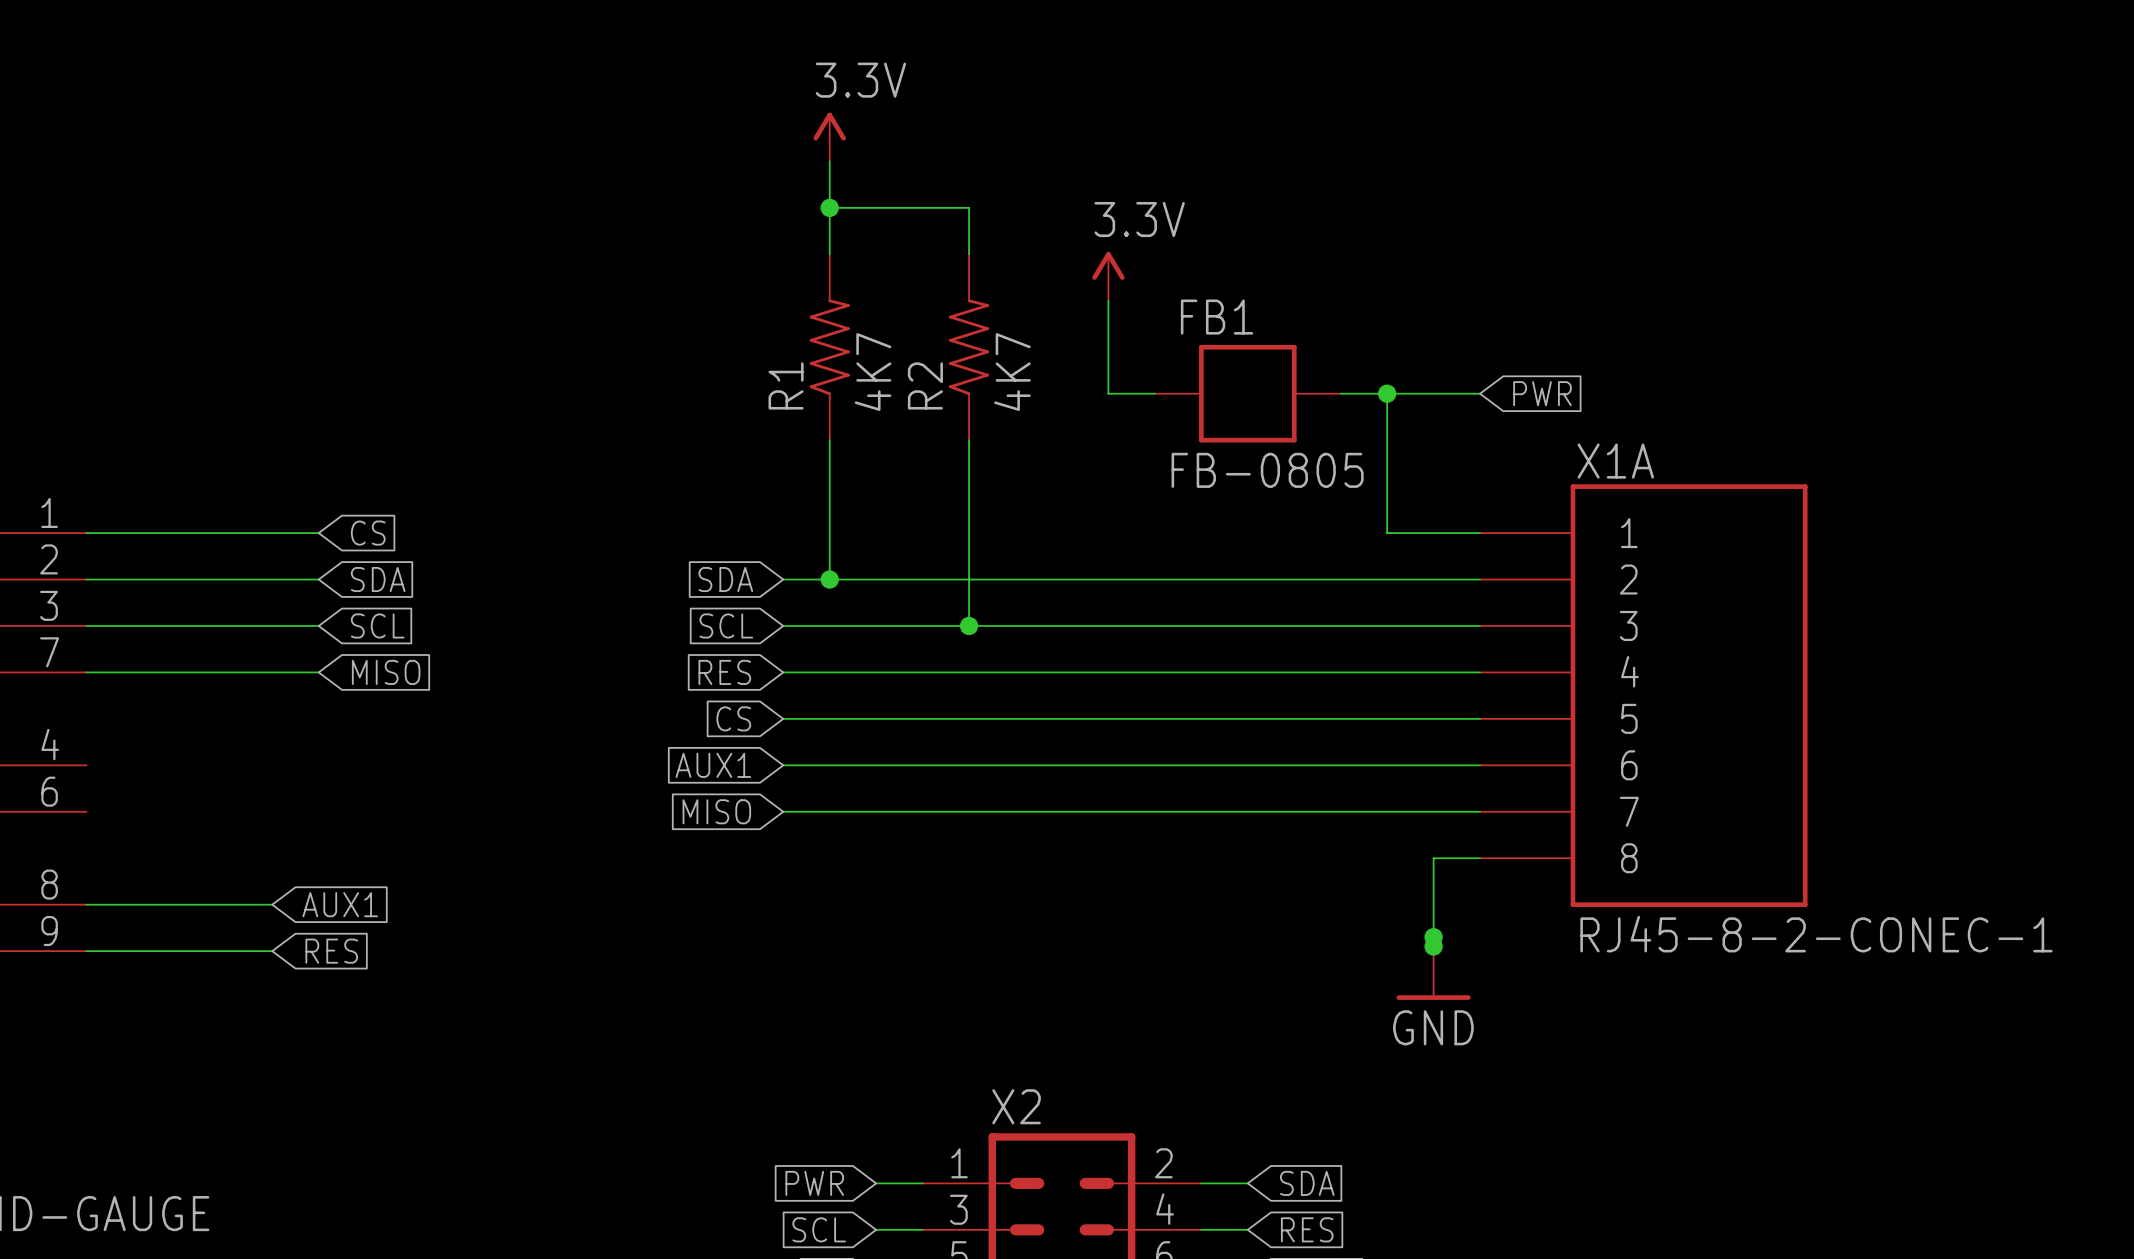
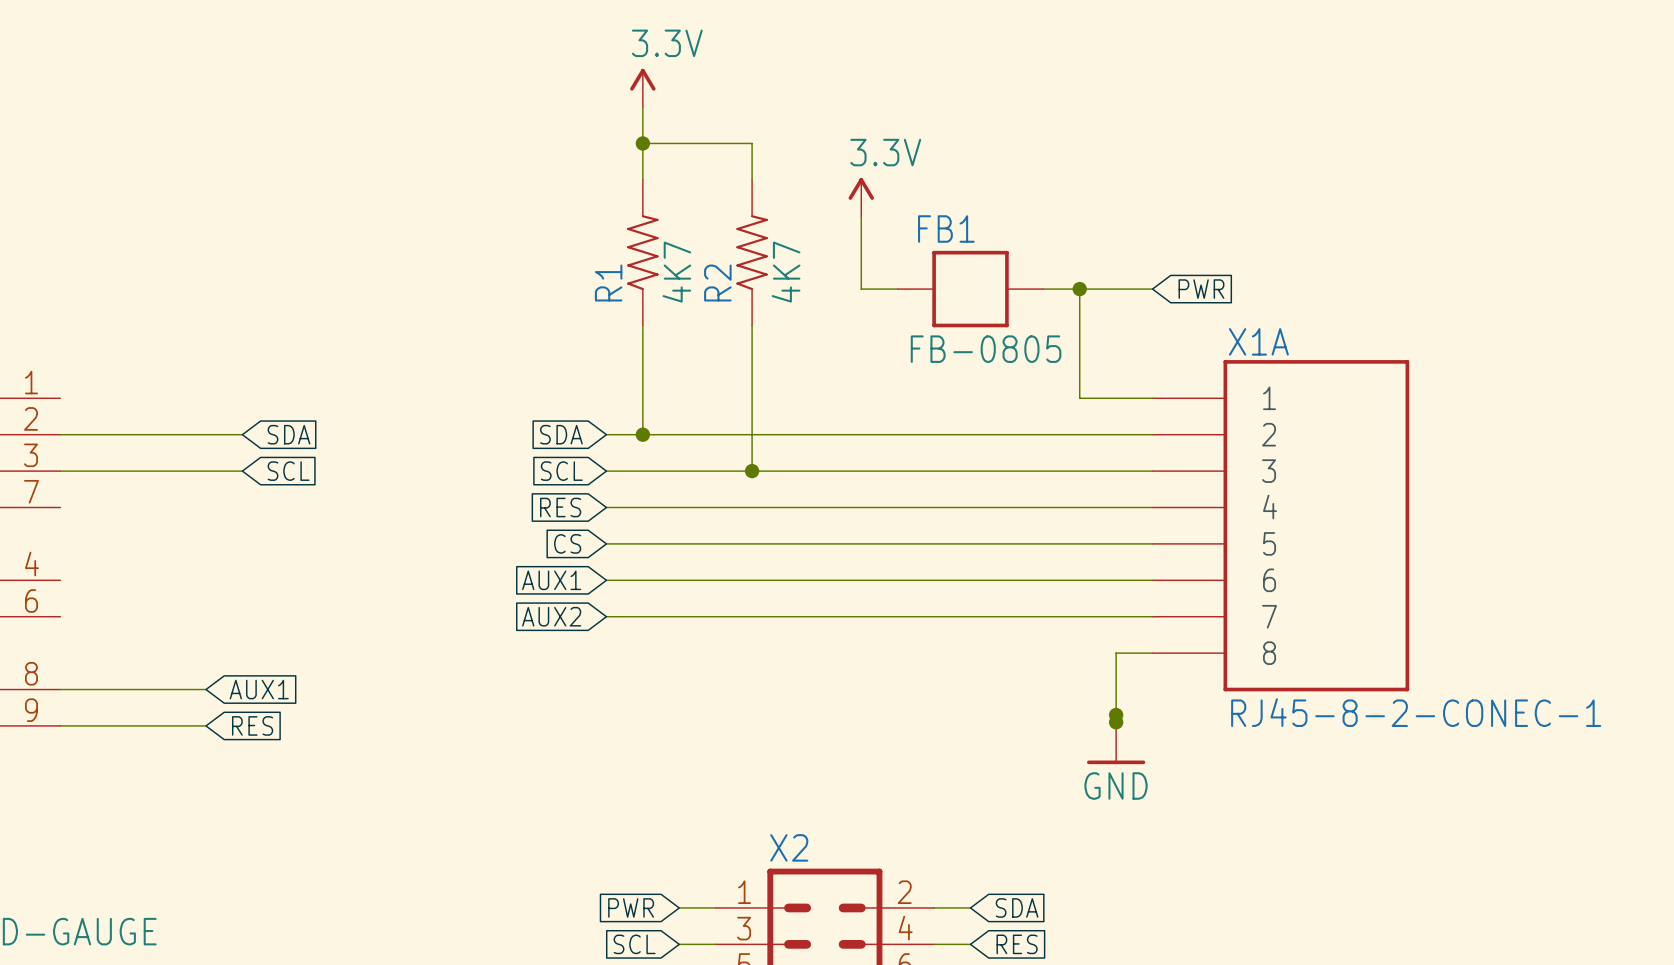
wire: (86, 533) (318, 533) -> none
global label: CS (368, 533) -> none
wire: (86, 672) (318, 672) -> none
global label: MISO (386, 672) -> none
global label: MISO (716, 811) -> AUX2 (551, 616)

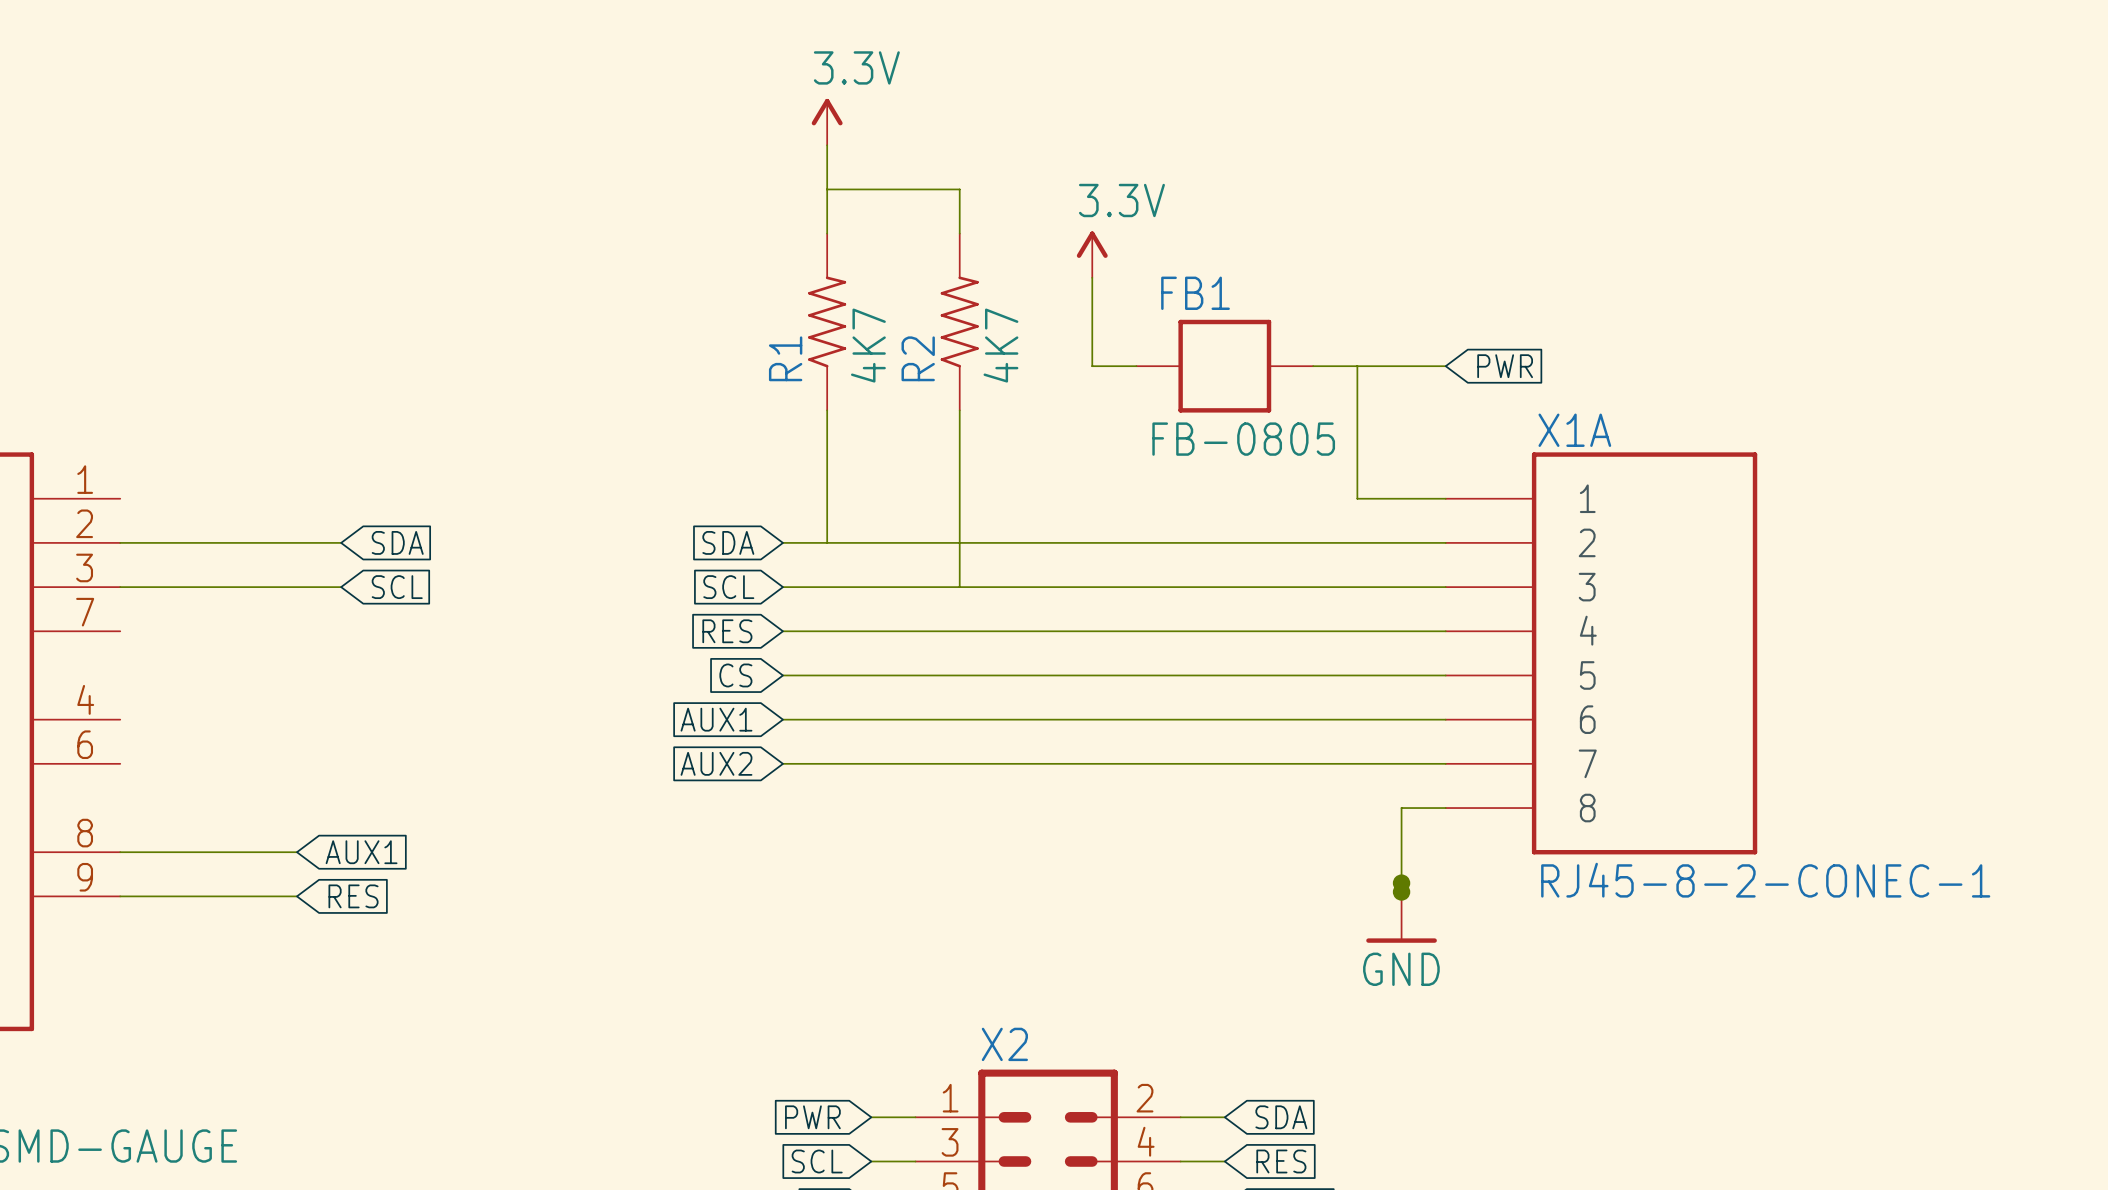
junction: (642, 143) -> none
junction: (1079, 289) -> none
junction: (642, 434) -> none
junction: (752, 471) -> none

